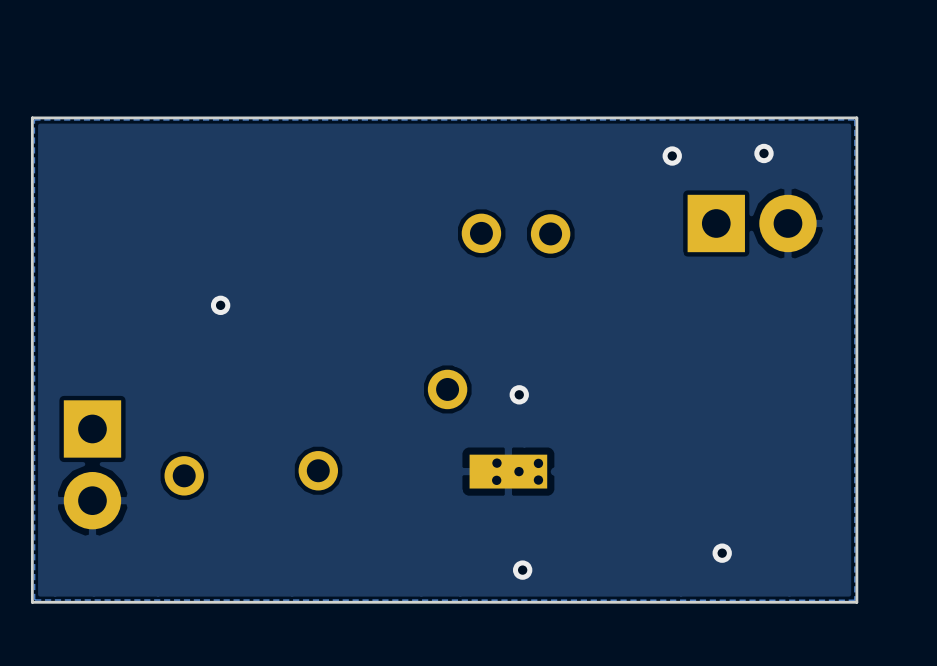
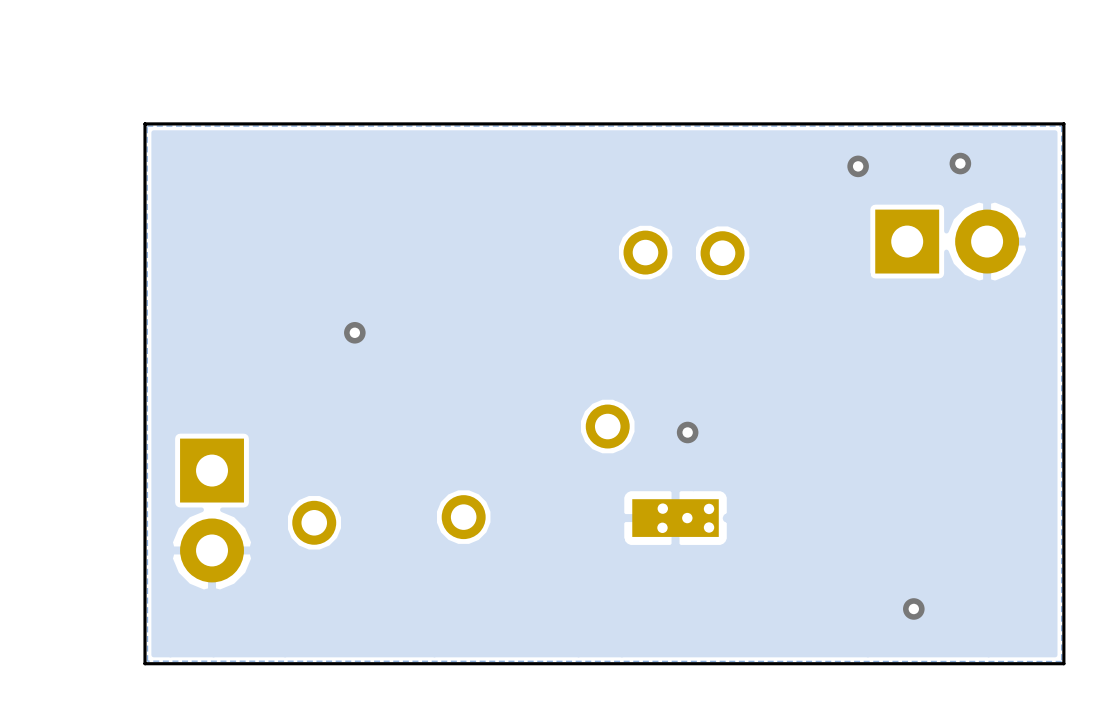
via: (522, 570) -> none

